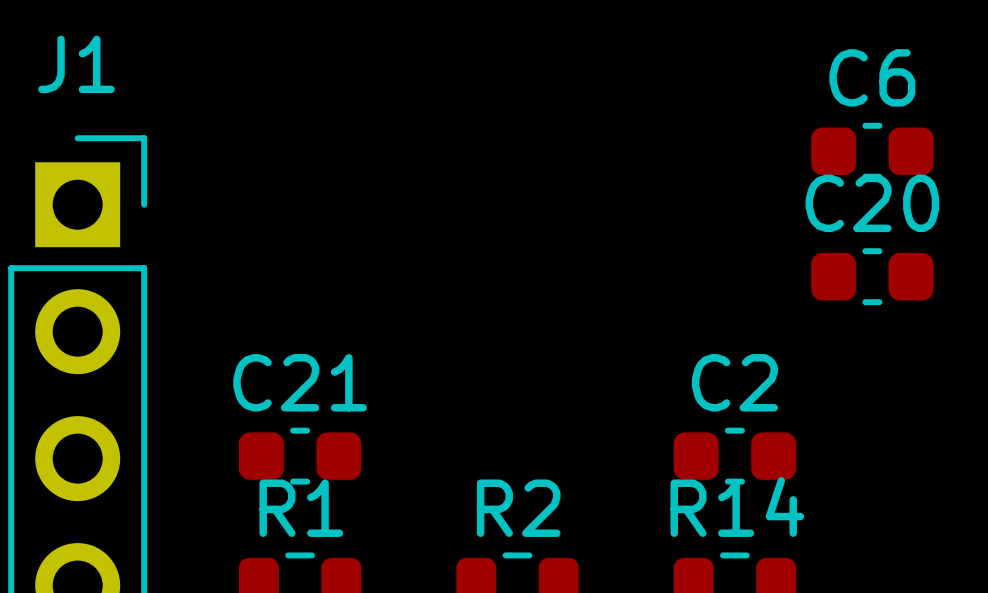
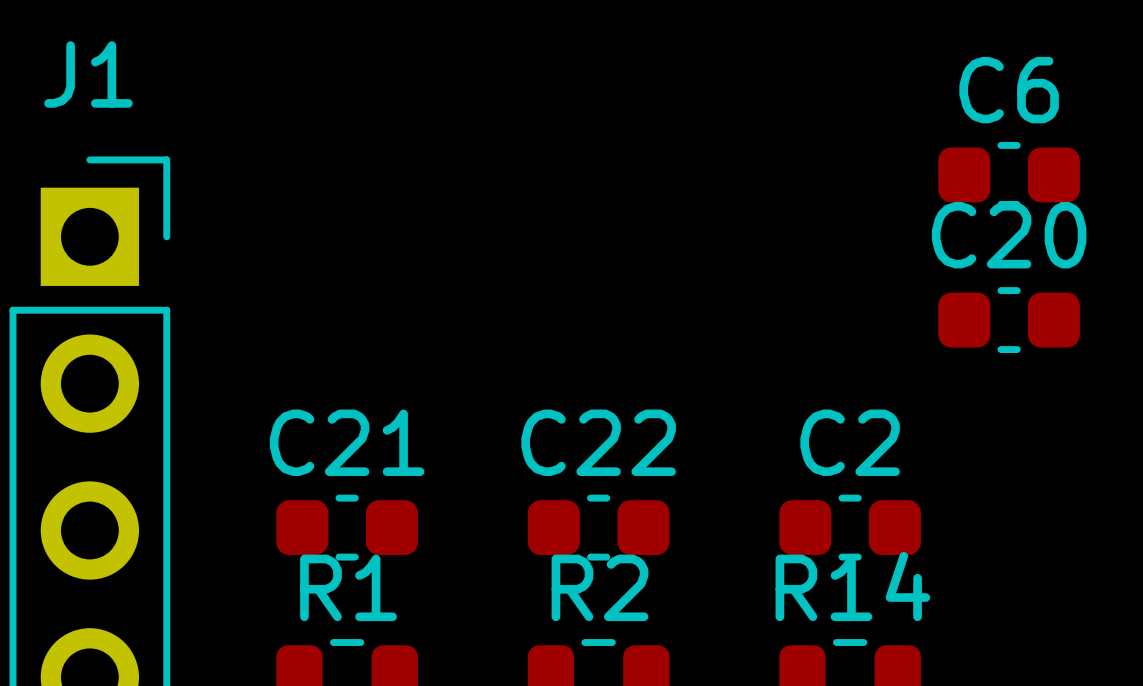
C22: none -> (598, 527)

